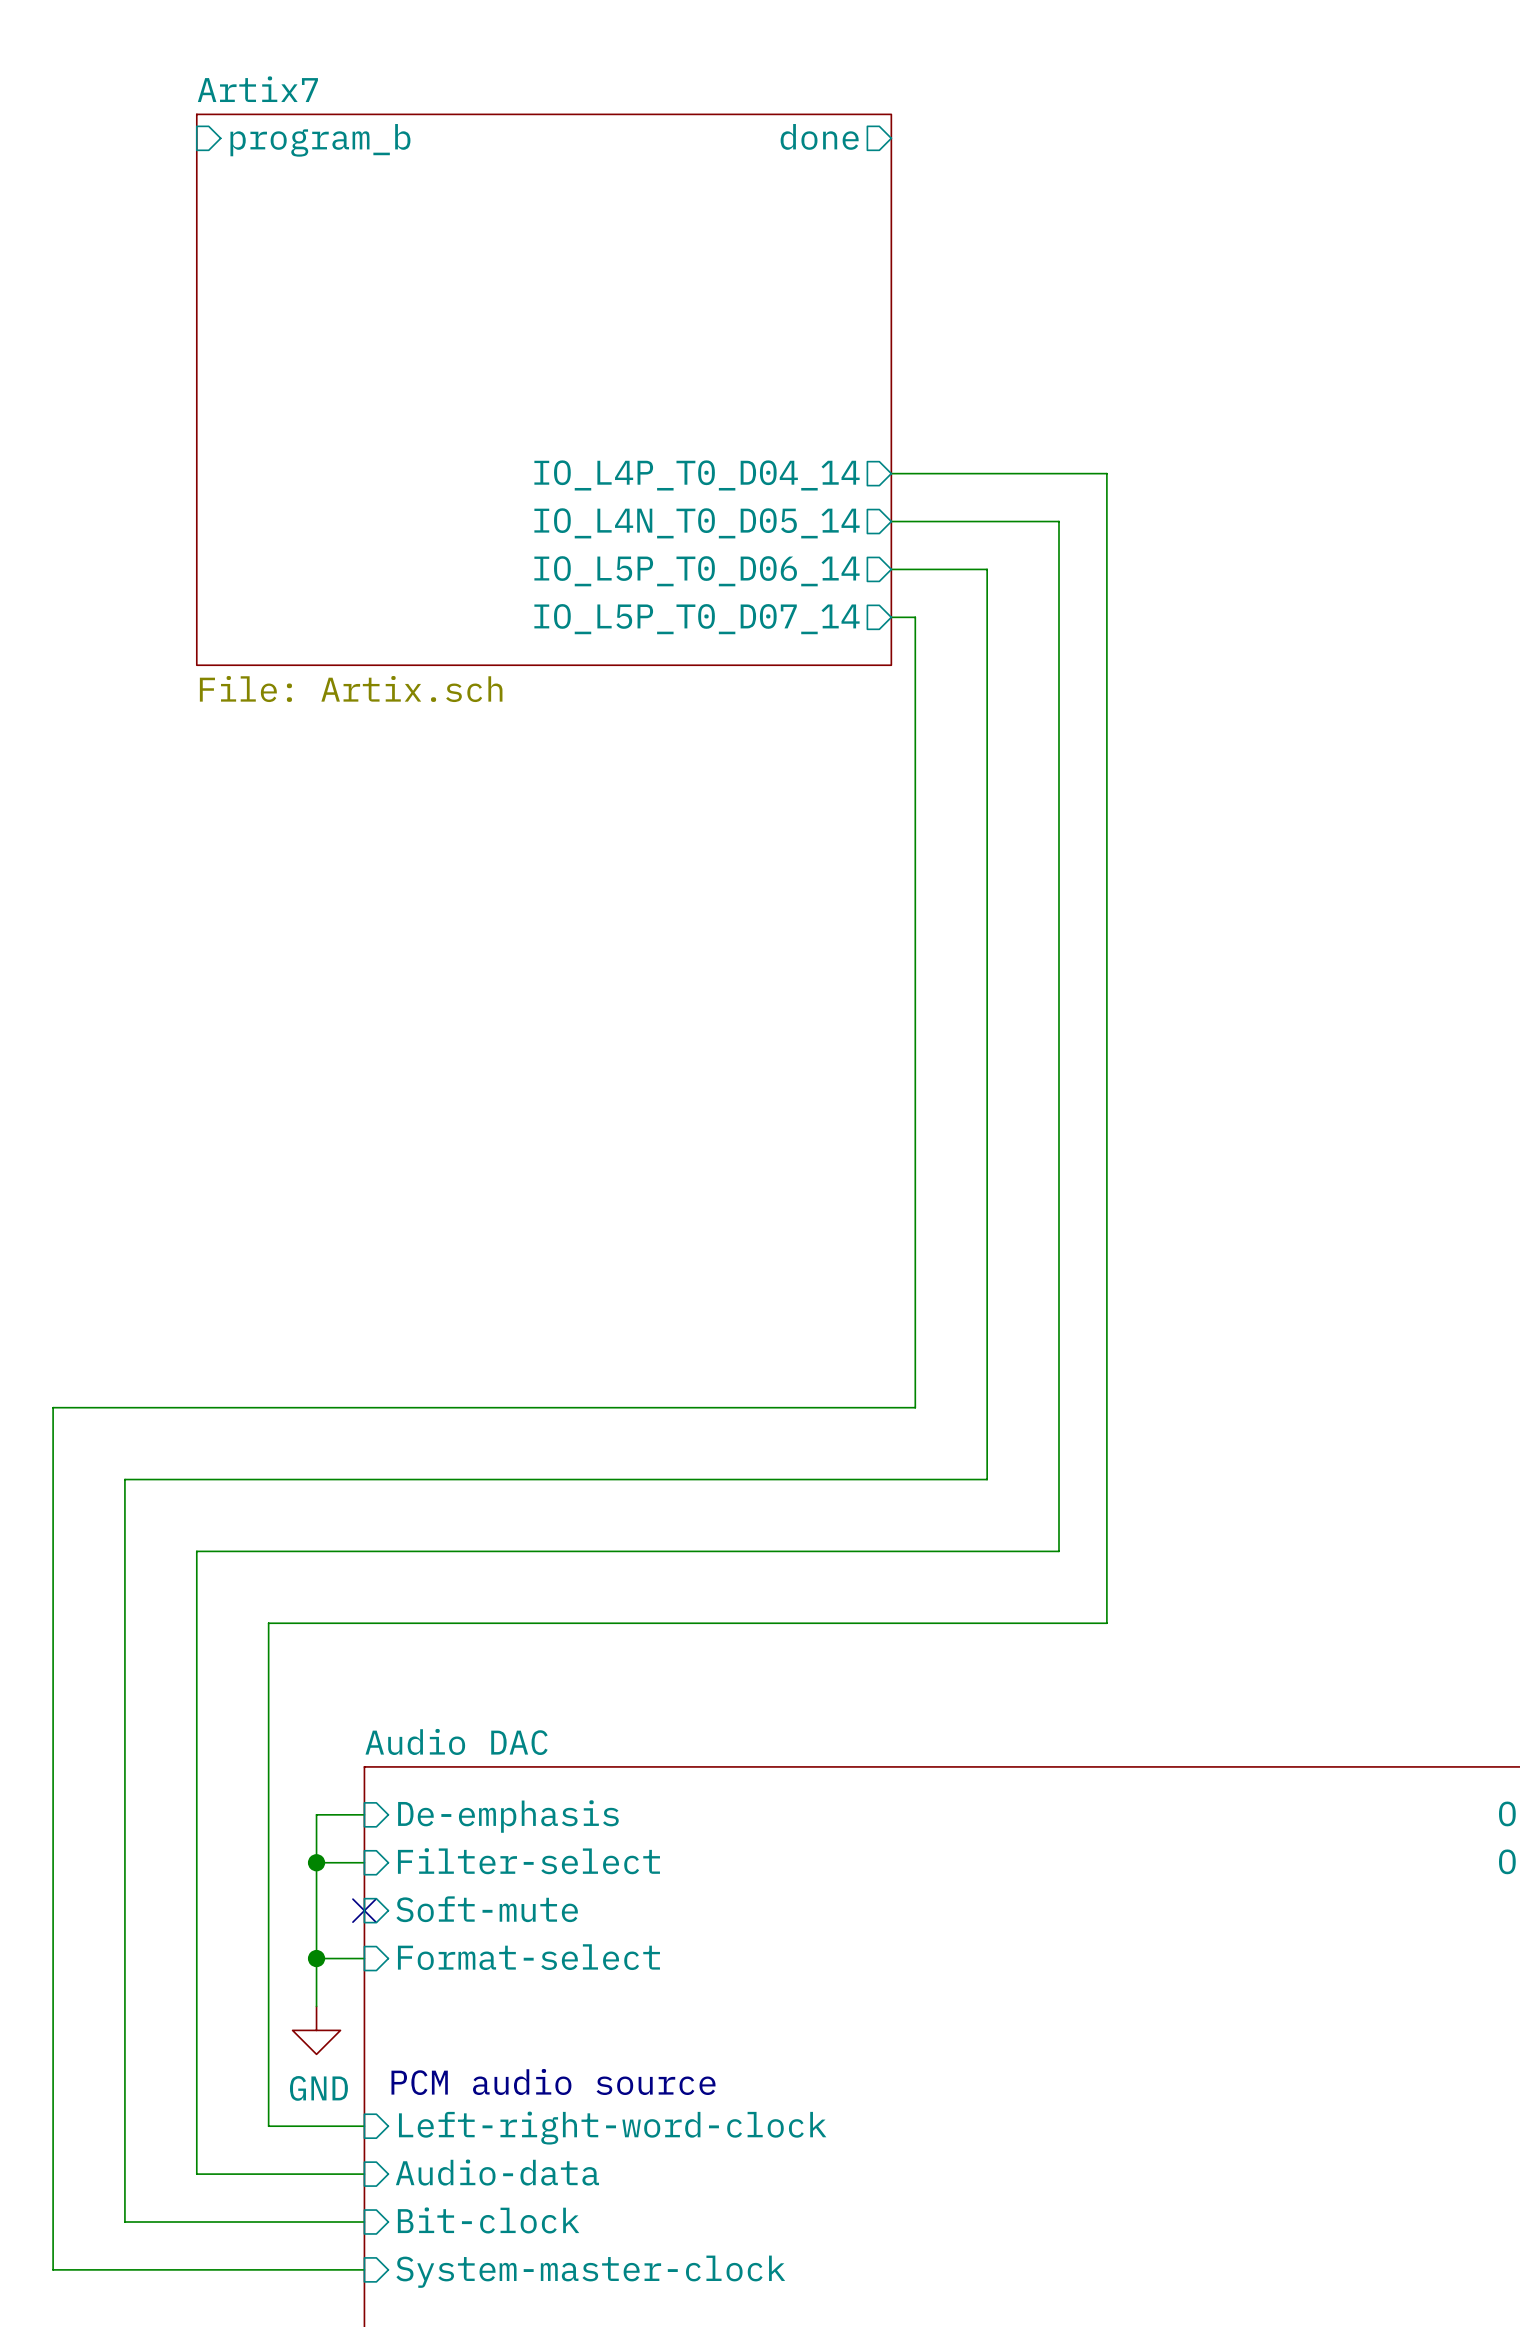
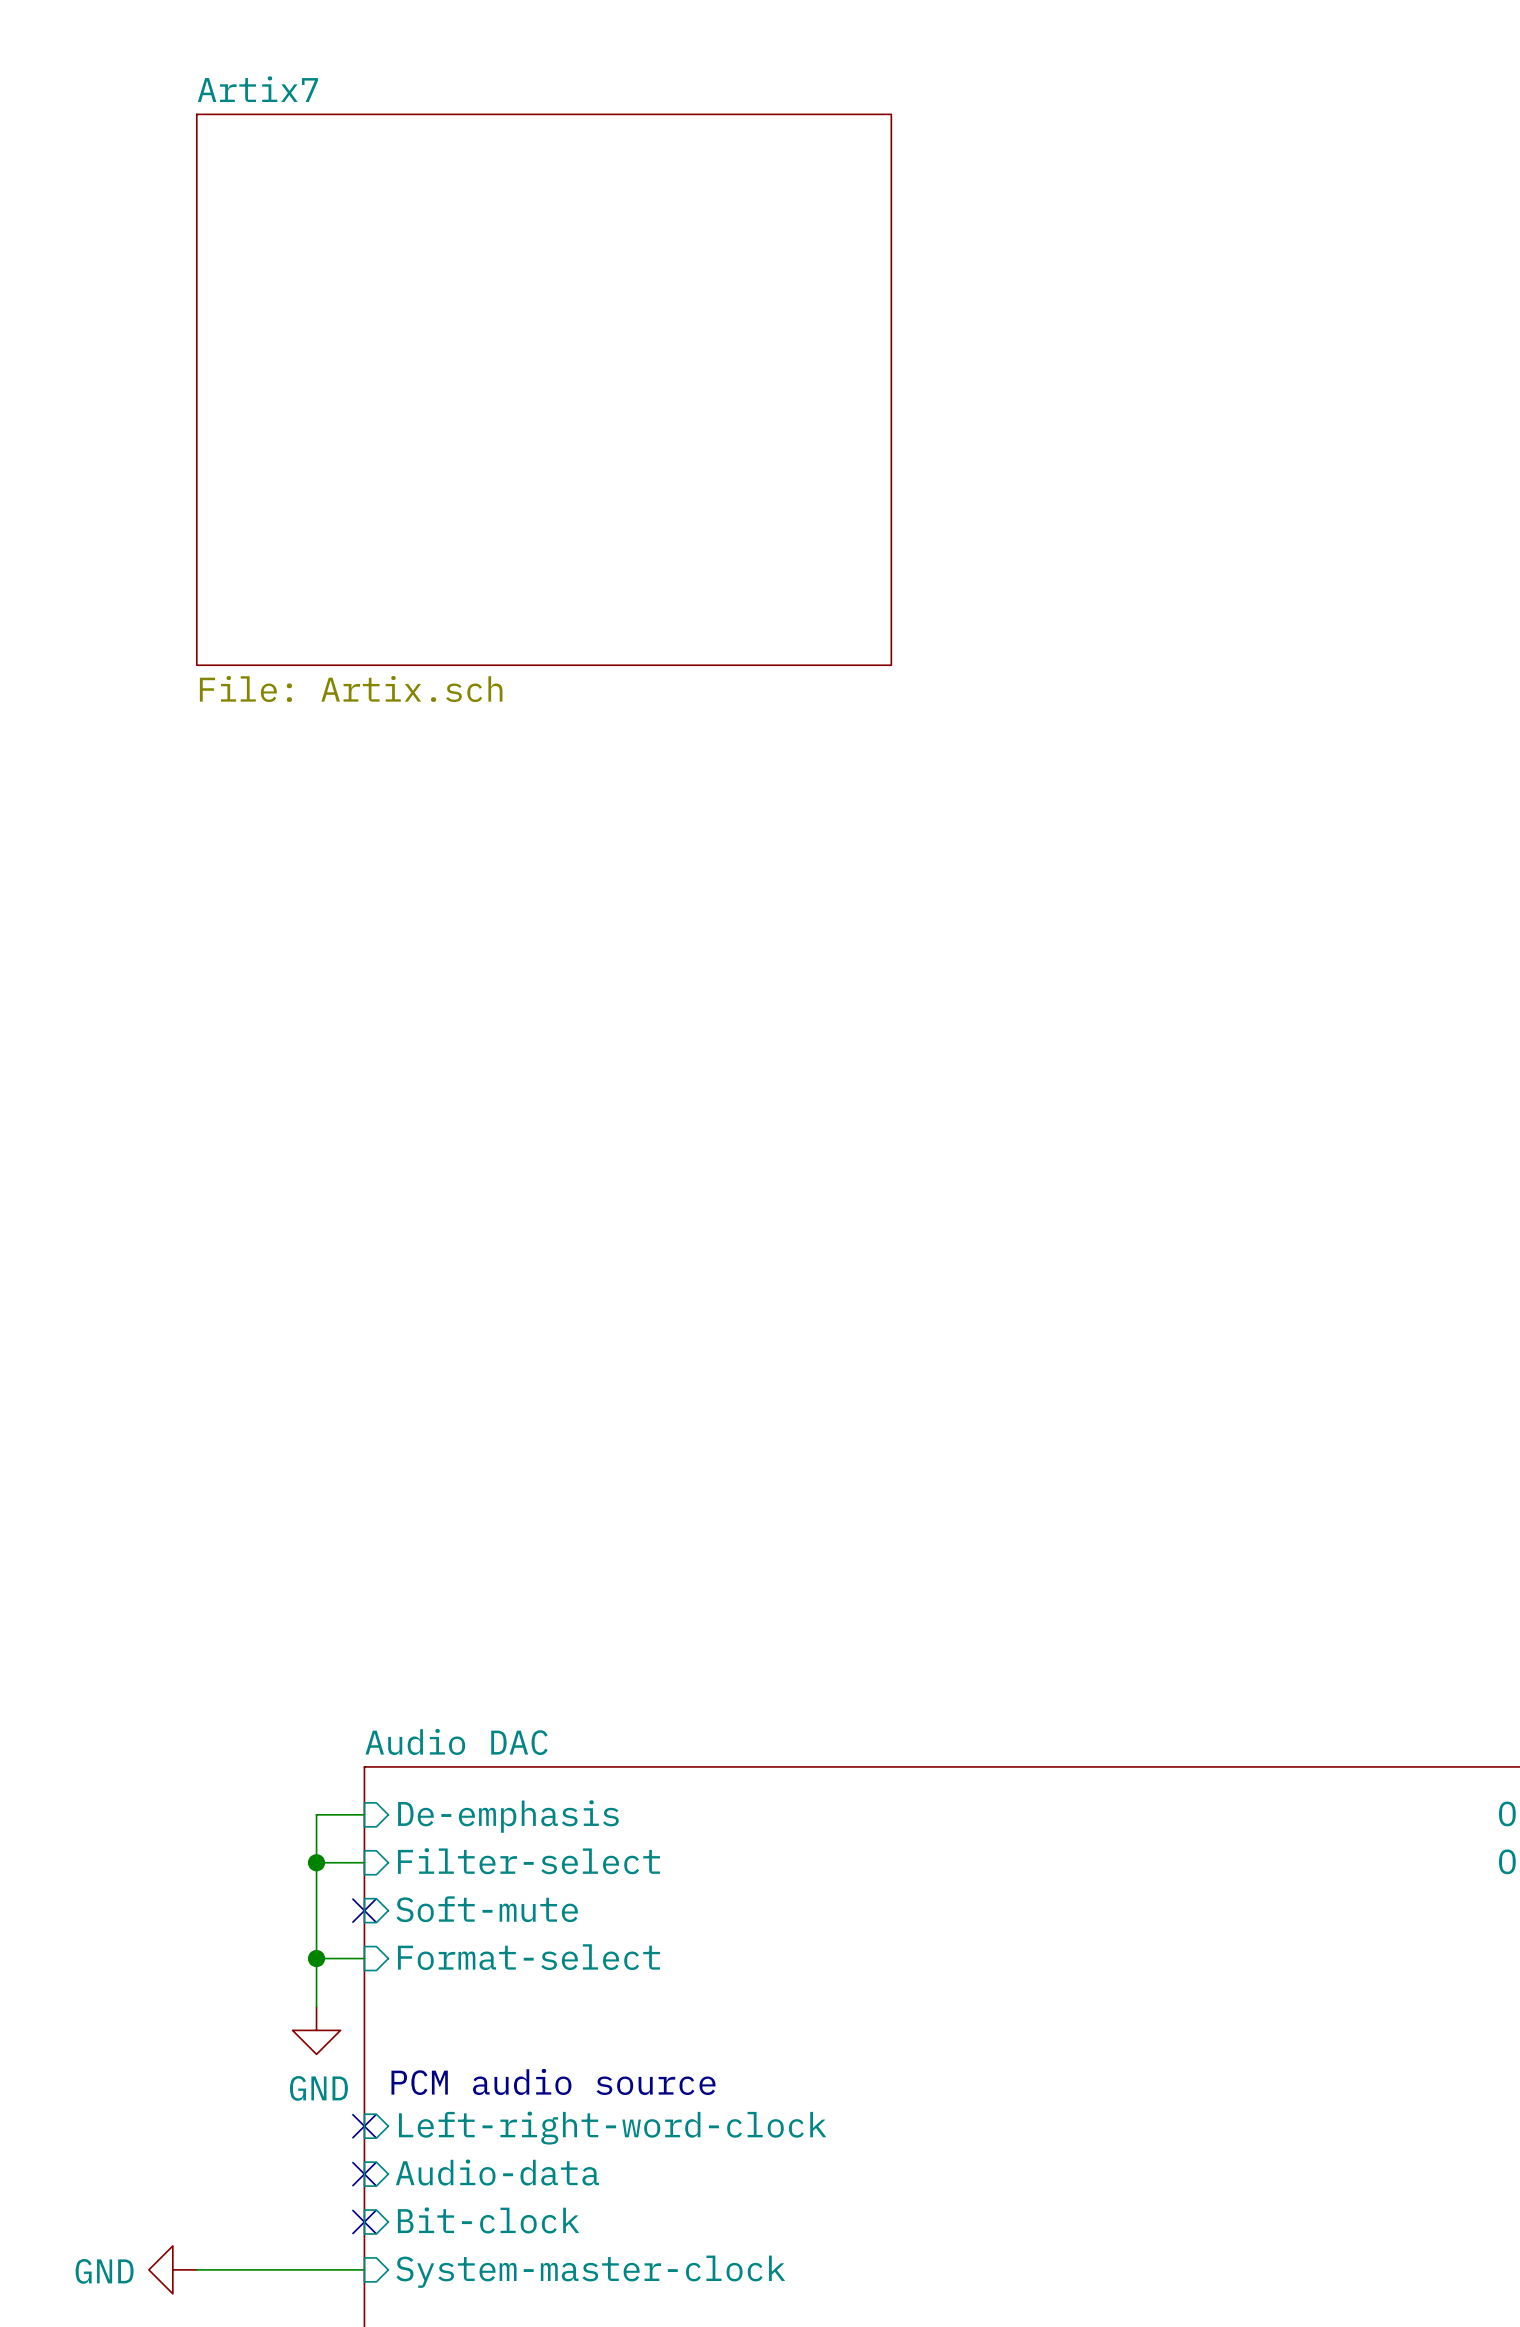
sheet pin: done (819, 136) -> none
sheet pin: program_b (320, 140) -> none
wire: (891, 473) (1106, 473) (1106, 1623) (268, 1623) (268, 2126) (364, 2126) -> none
sheet pin: IO_L4P_T0_D04_14 (697, 475) -> none
wire: (891, 521) (1058, 521) (1058, 1551) (196, 1551) (196, 2174) (364, 2174) -> none
sheet pin: IO_L4N_T0_D05_14 (697, 523) -> none
wire: (891, 569) (987, 569) (987, 1479) (124, 1479) (124, 2222) (364, 2222) -> none
sheet pin: IO_L5P_T0_D06_14 (697, 571) -> none
wire: (891, 617) (915, 617) (915, 1407) (53, 1407) (53, 2269) (196, 2269) -> none
sheet pin: IO_L5P_T0_D07_14 (697, 619) -> none
no-connect mark: none -> (364, 2126)
no-connect mark: none -> (364, 2174)
no-connect mark: none -> (364, 2222)
power symbol: none -> GND (172, 2269)

